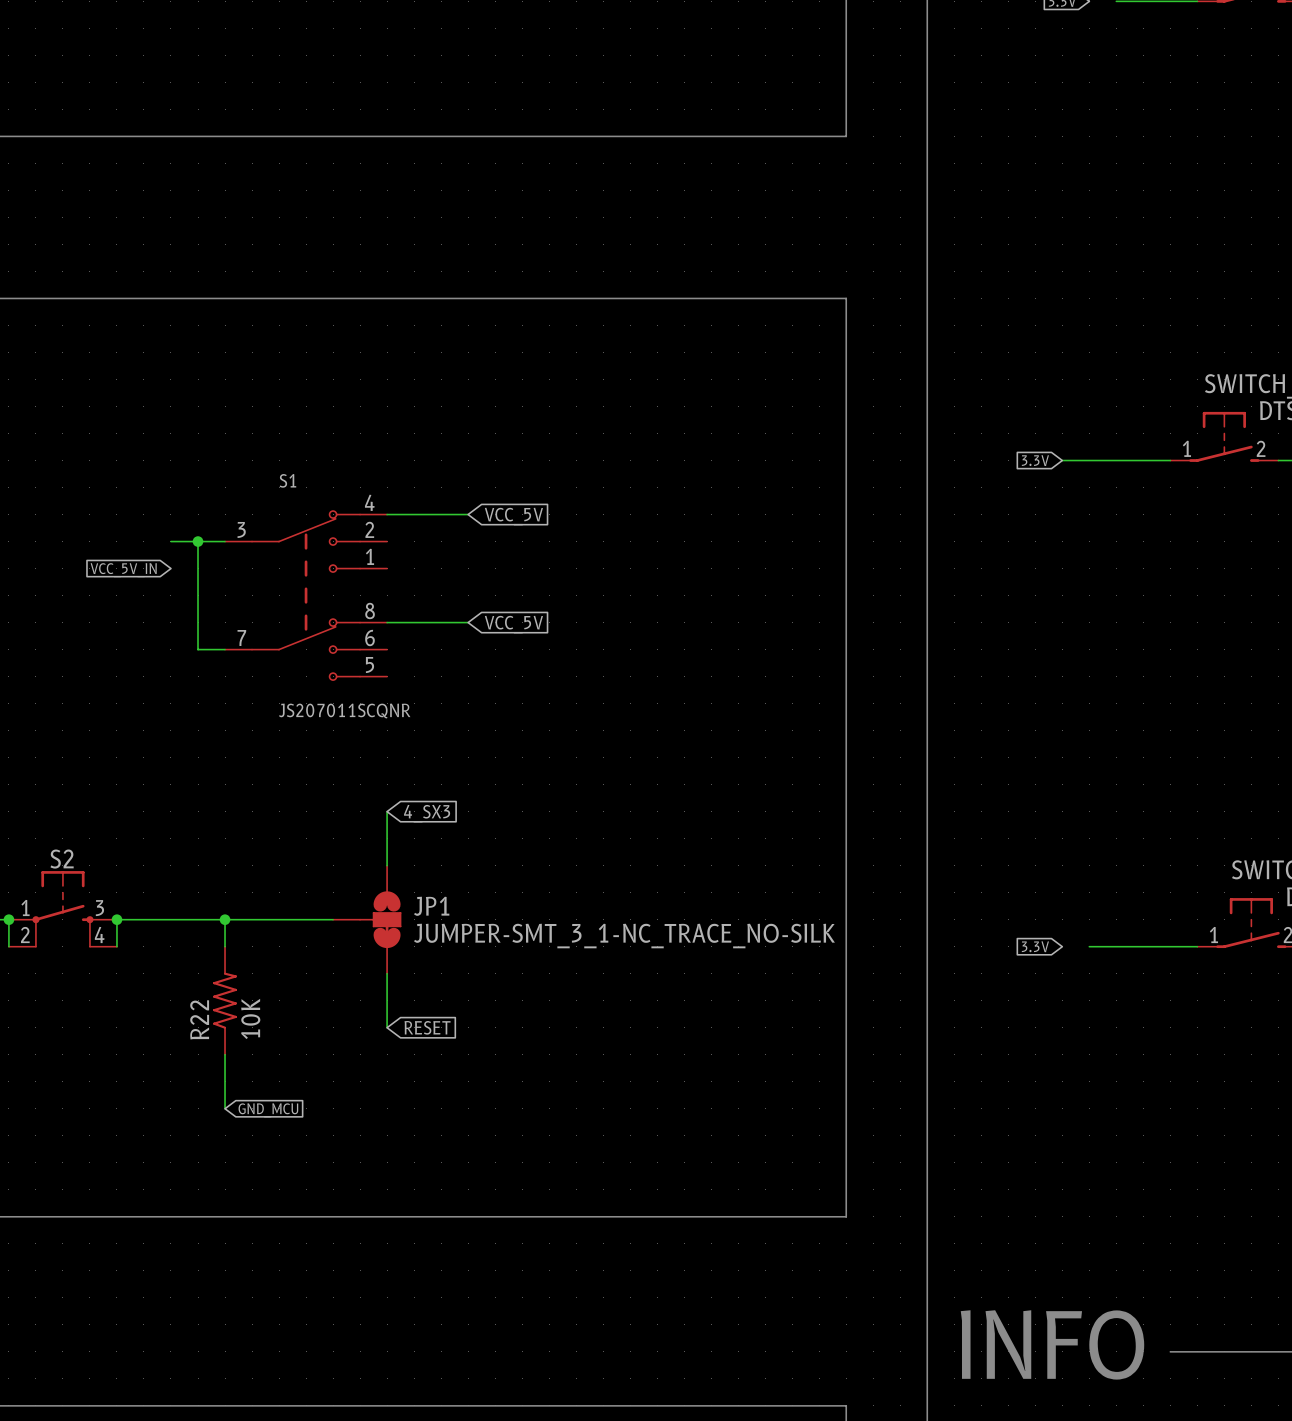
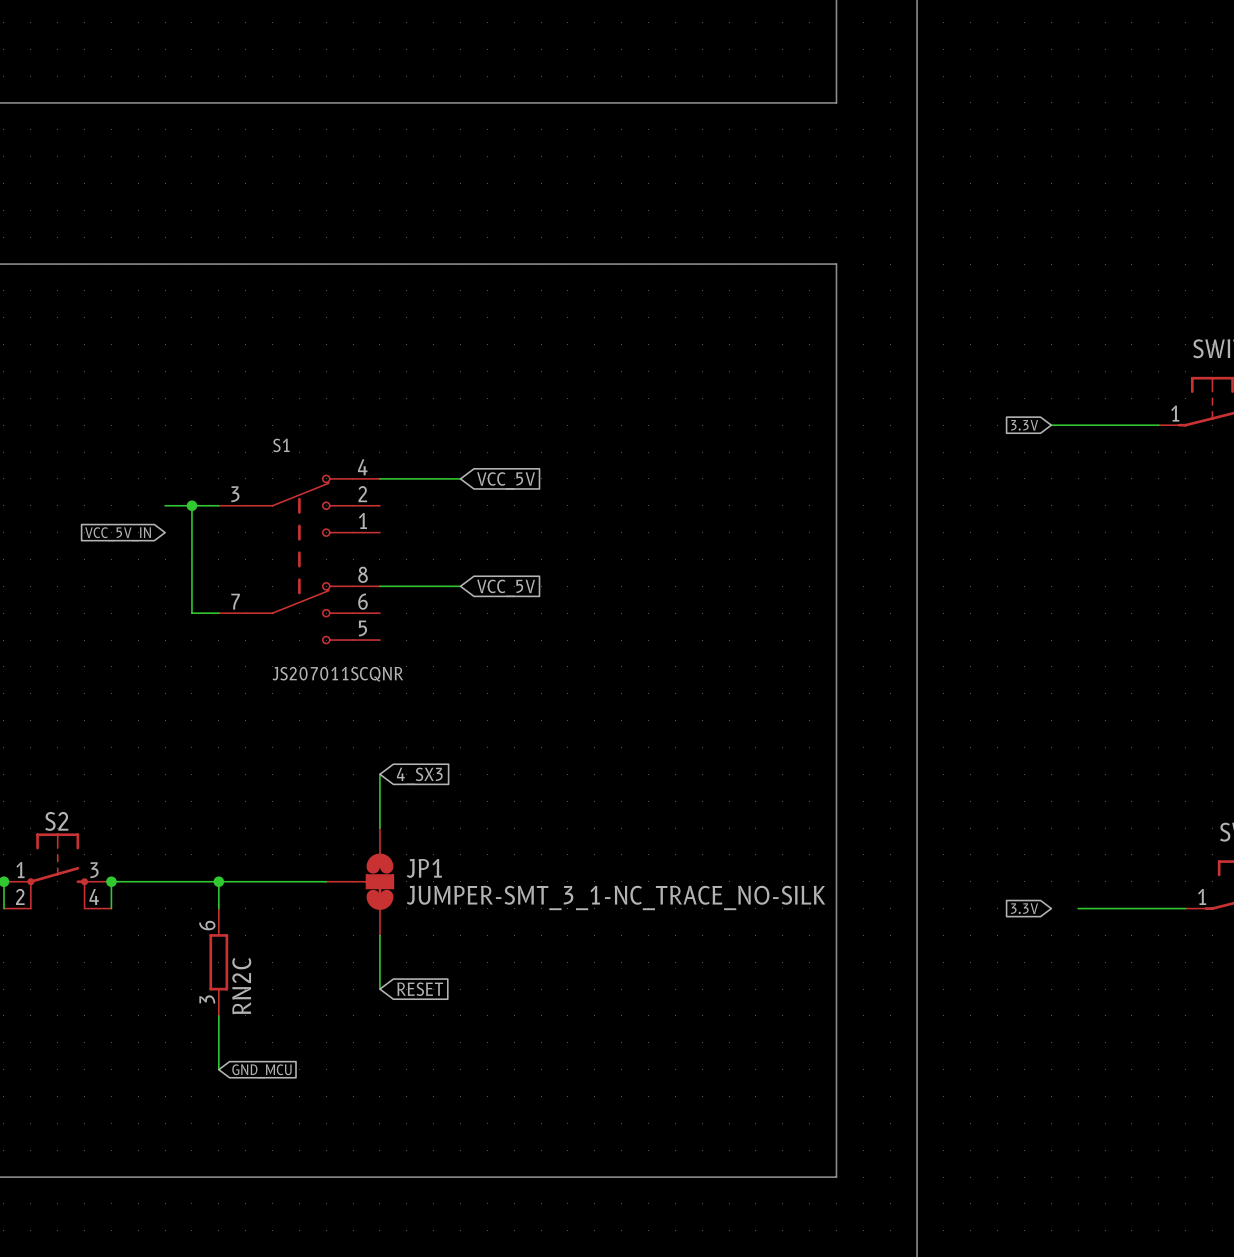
R22: 10K (225, 1000) -> none
RN2C: none -> (218, 962)

